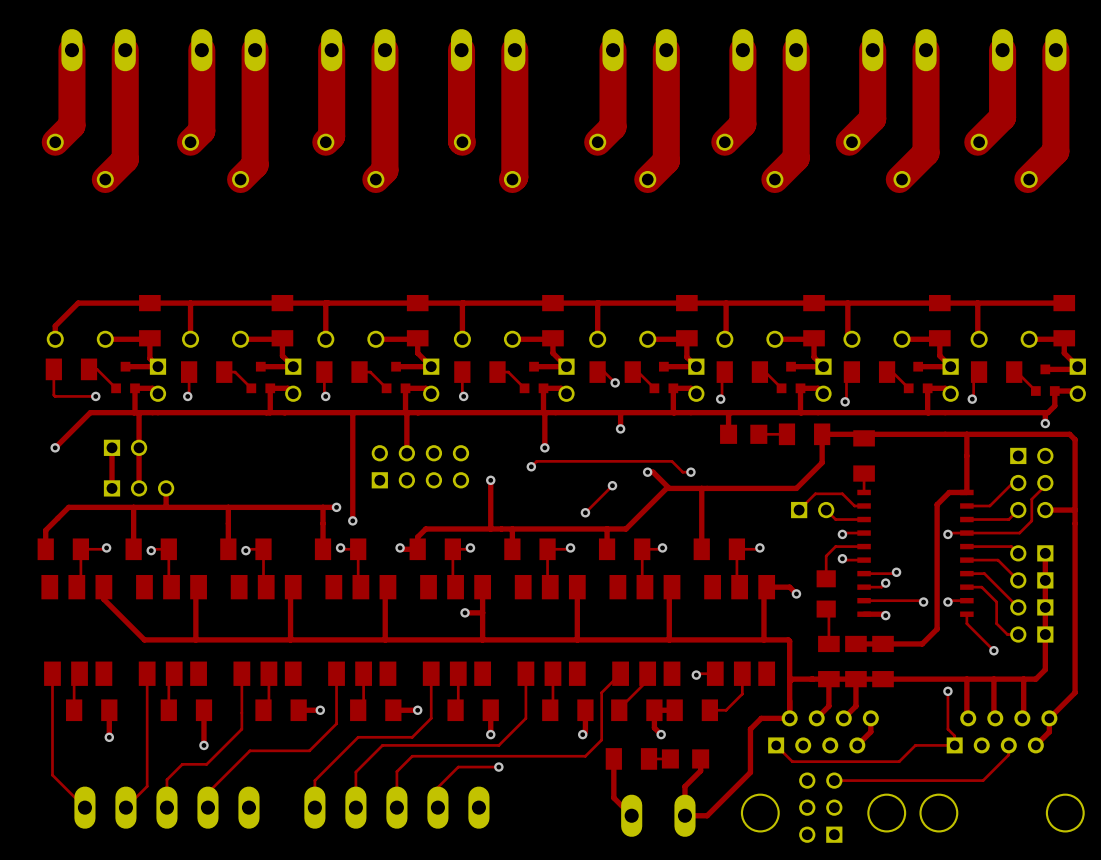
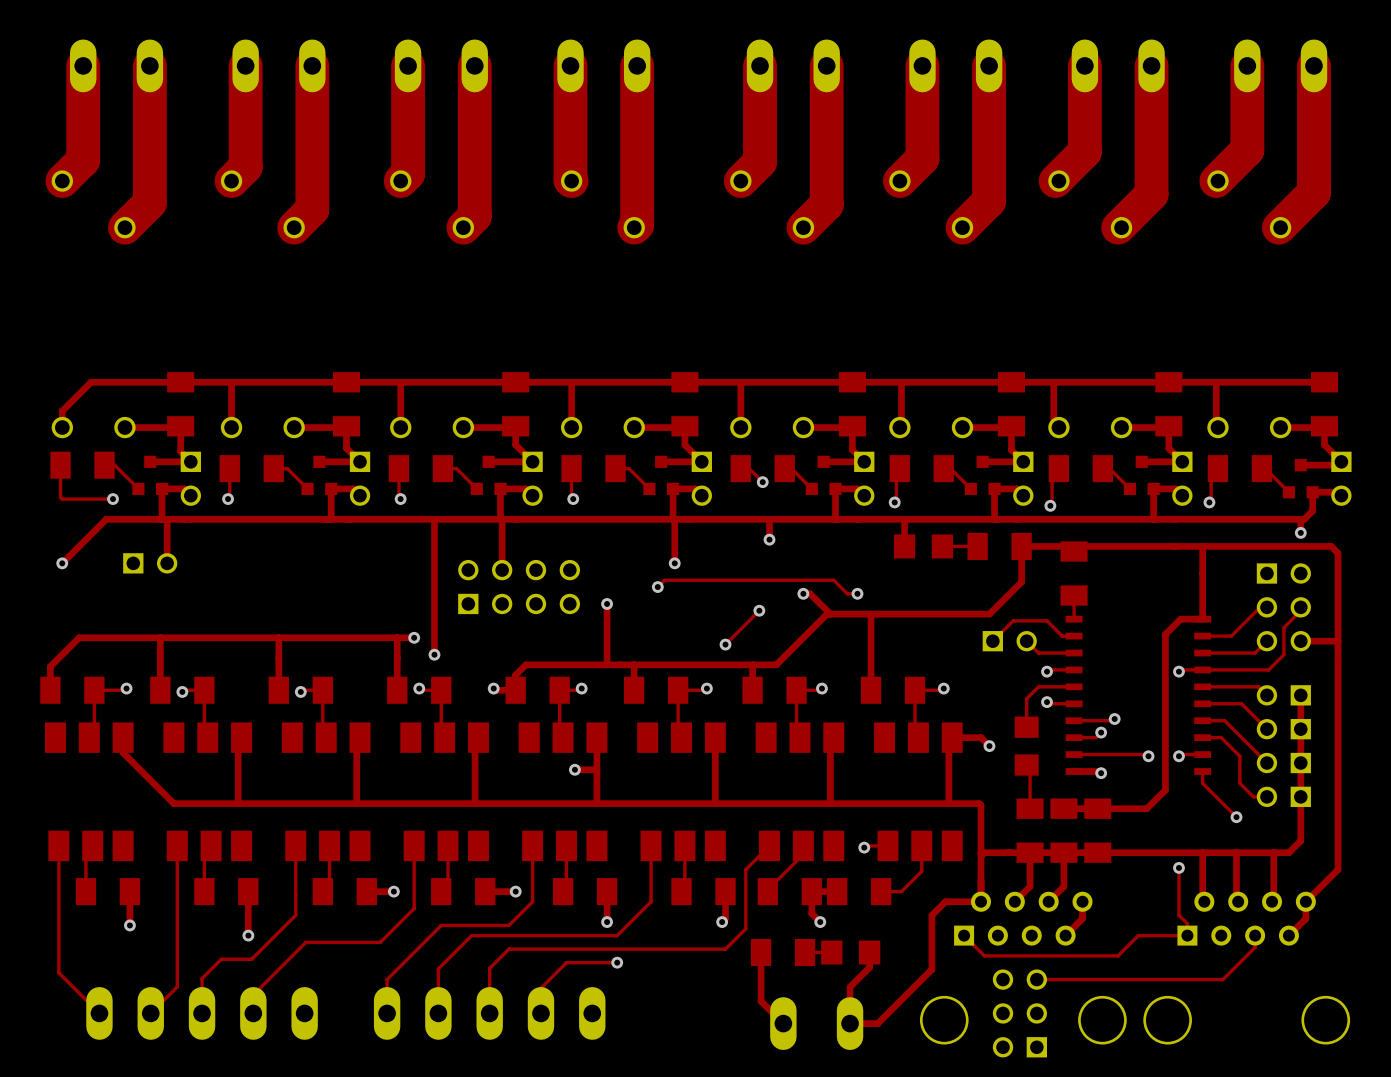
track: (112, 447) (112, 488) -> none
track: (139, 447) (139, 488) -> none
part: (139, 488) -> none
track: (166, 488) (166, 507) -> none

